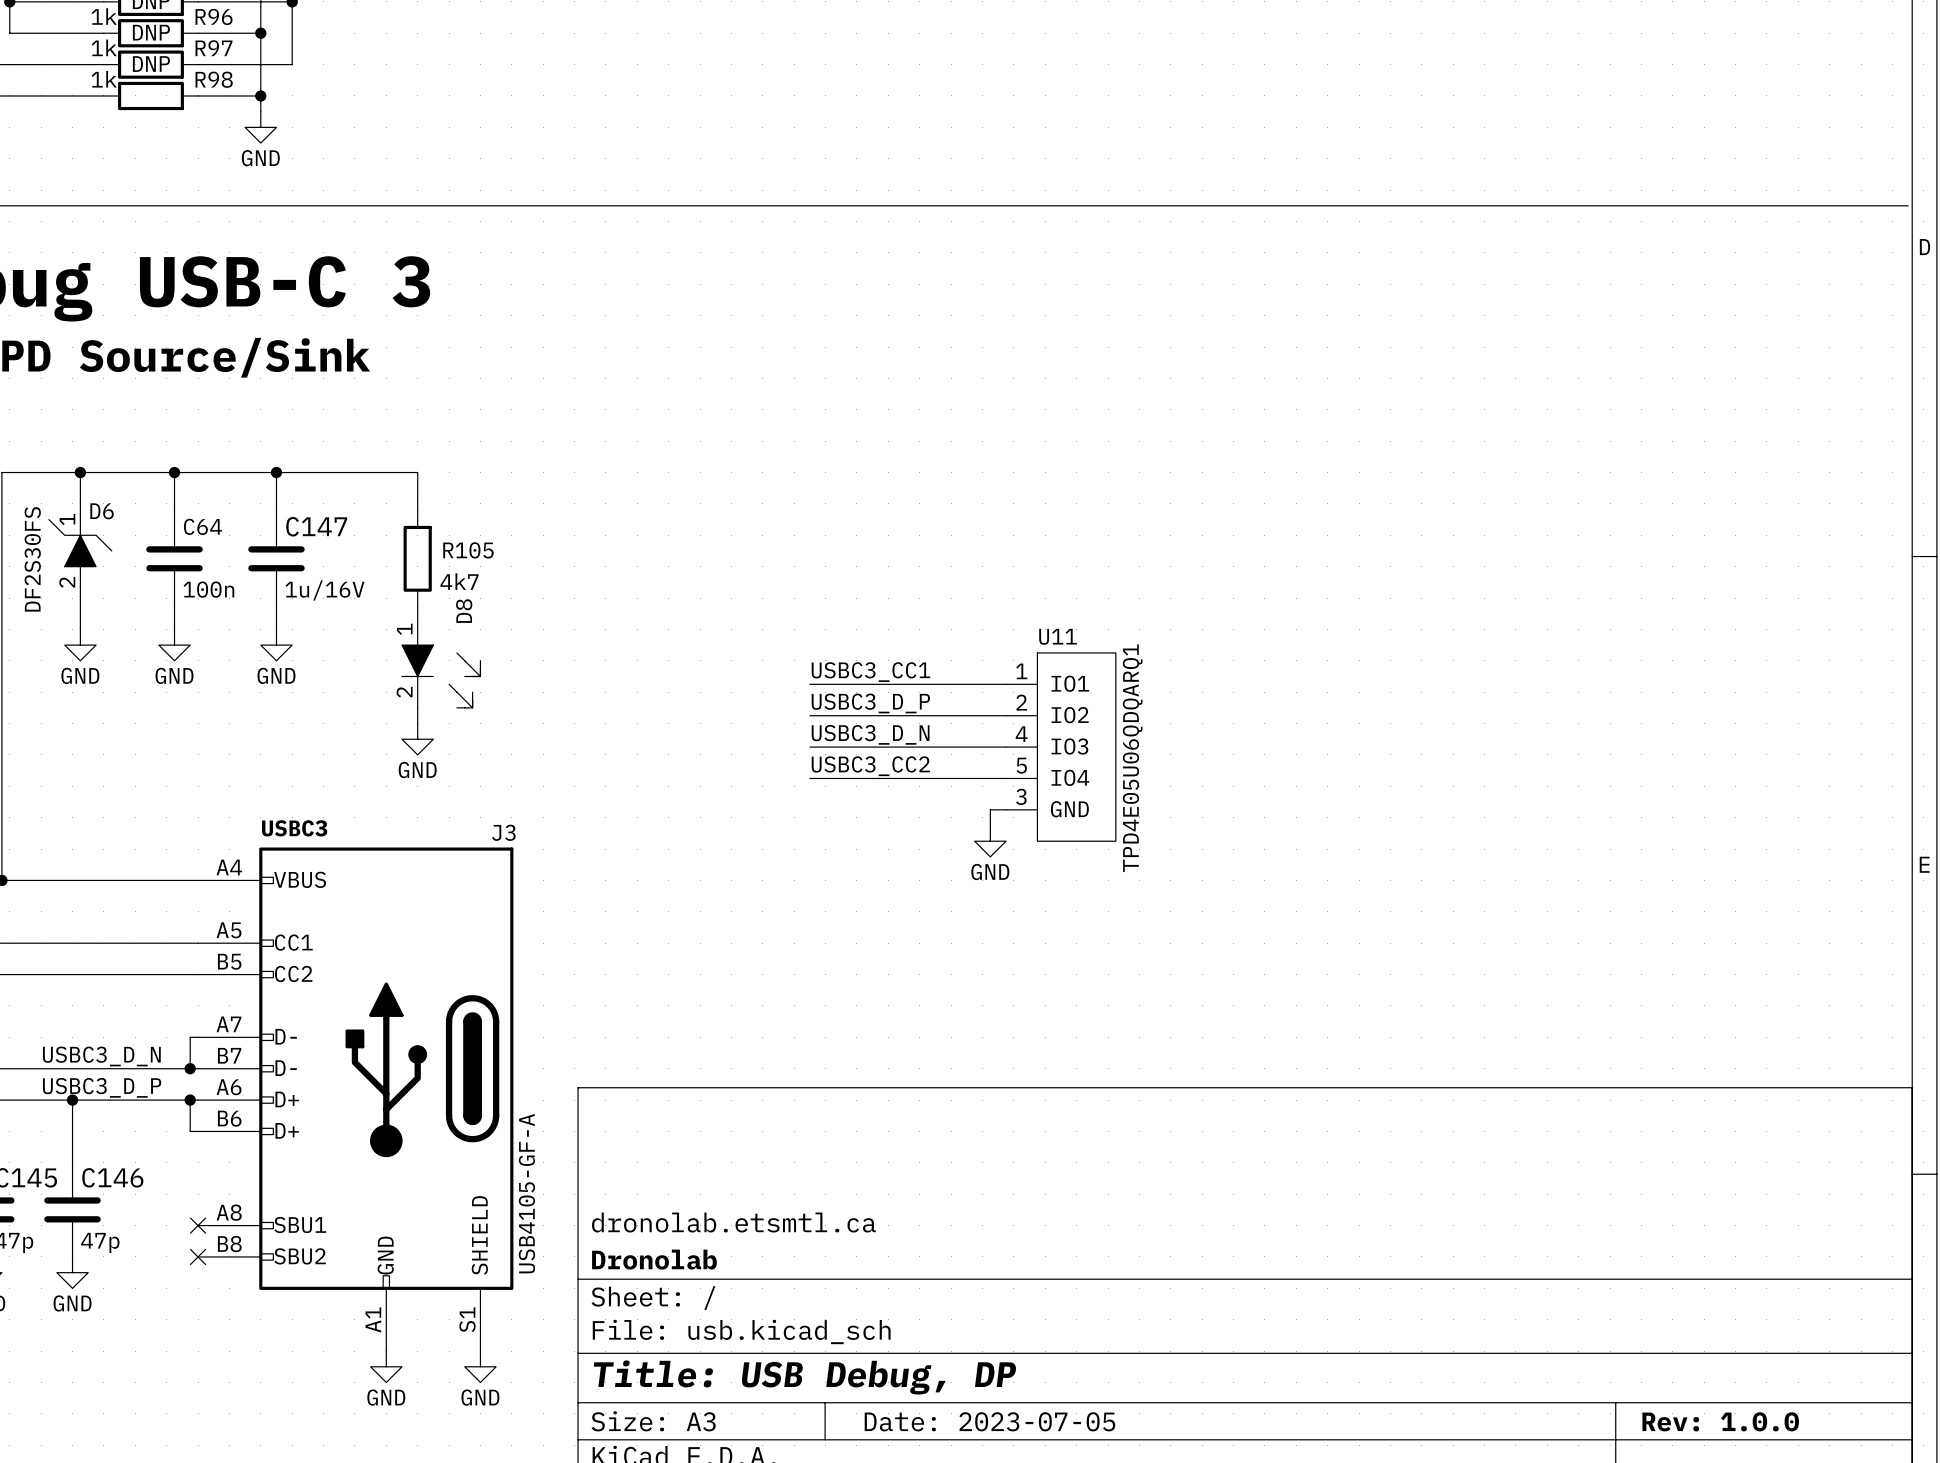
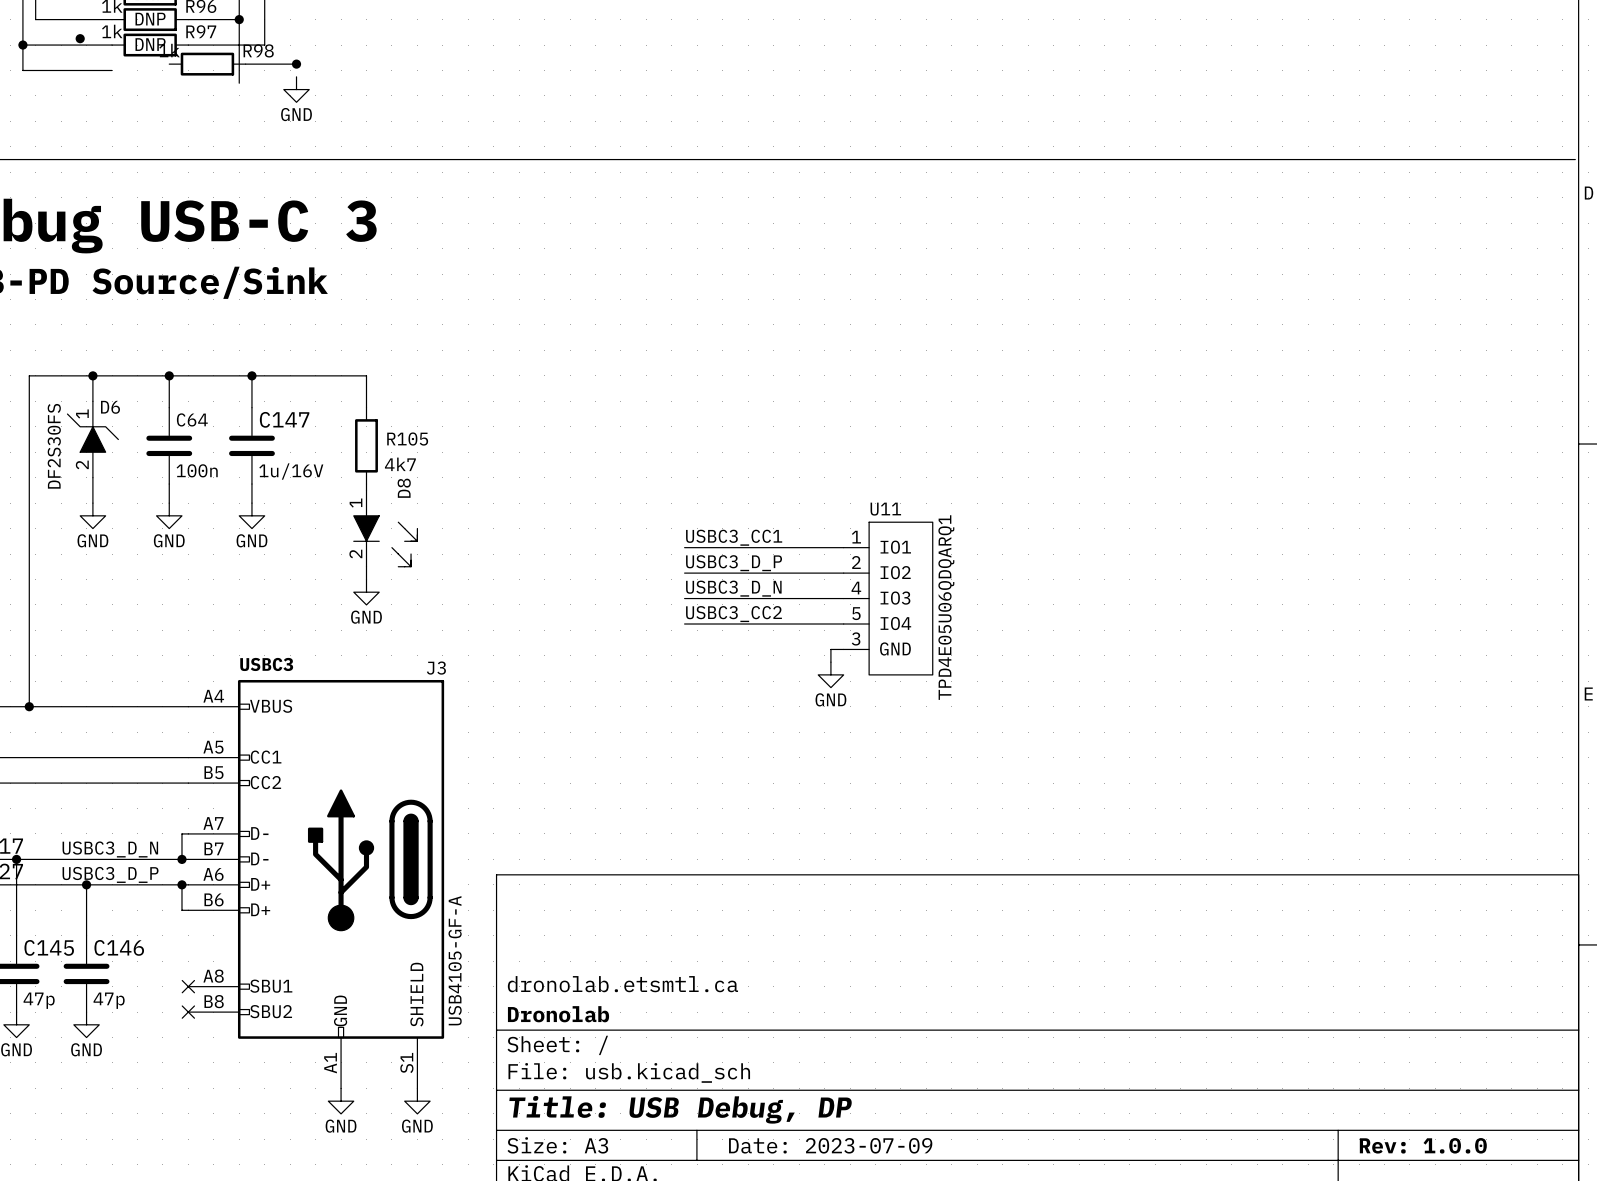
junction: none -> (80, 38)
R98 position: (150, 95) -> (207, 64)
wire: (198, 95) (260, 95) -> (245, 64) (296, 64)
junction position: (260, 95) -> (296, 64)
power symbol position: GND (260, 127) -> GND (296, 89)
title block: Date: 2023-07-05 (989, 1421) -> Date: 2023-07-09 (830, 1145)

